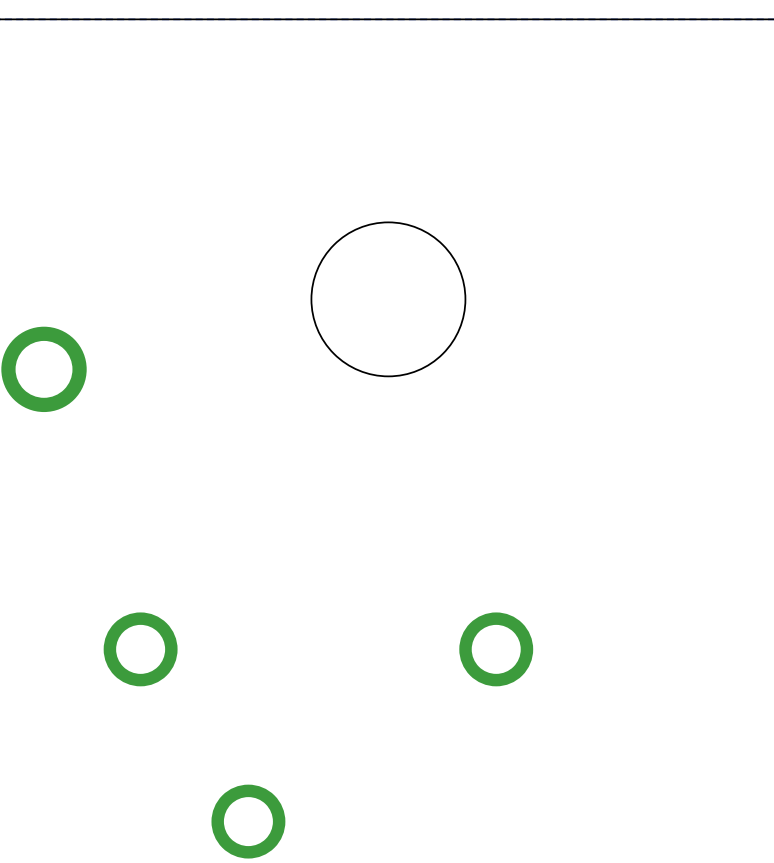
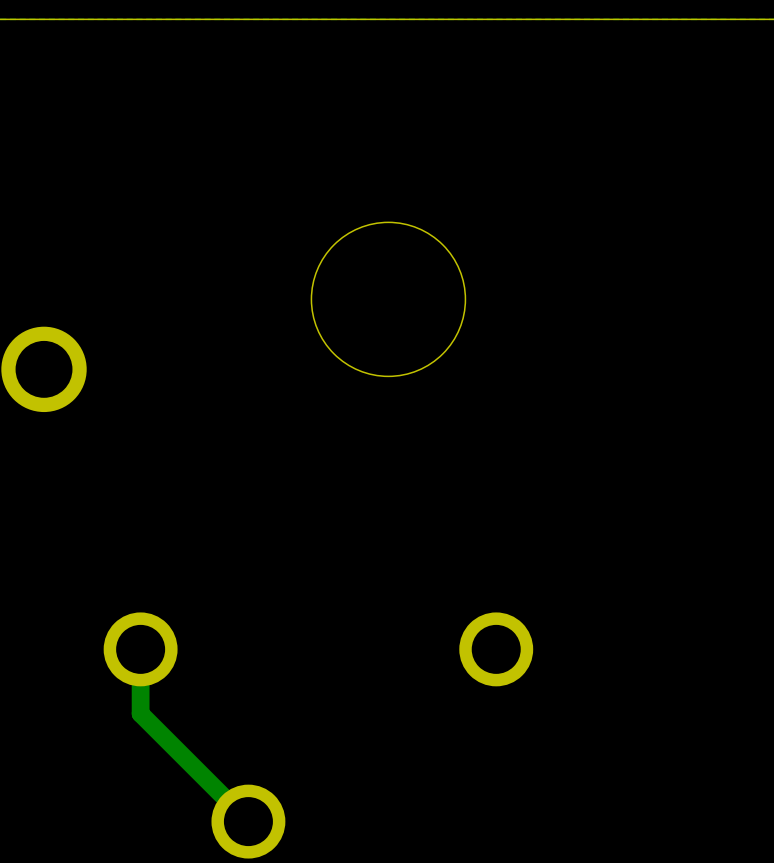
track: none -> (140, 649) (140, 713) (248, 821)

